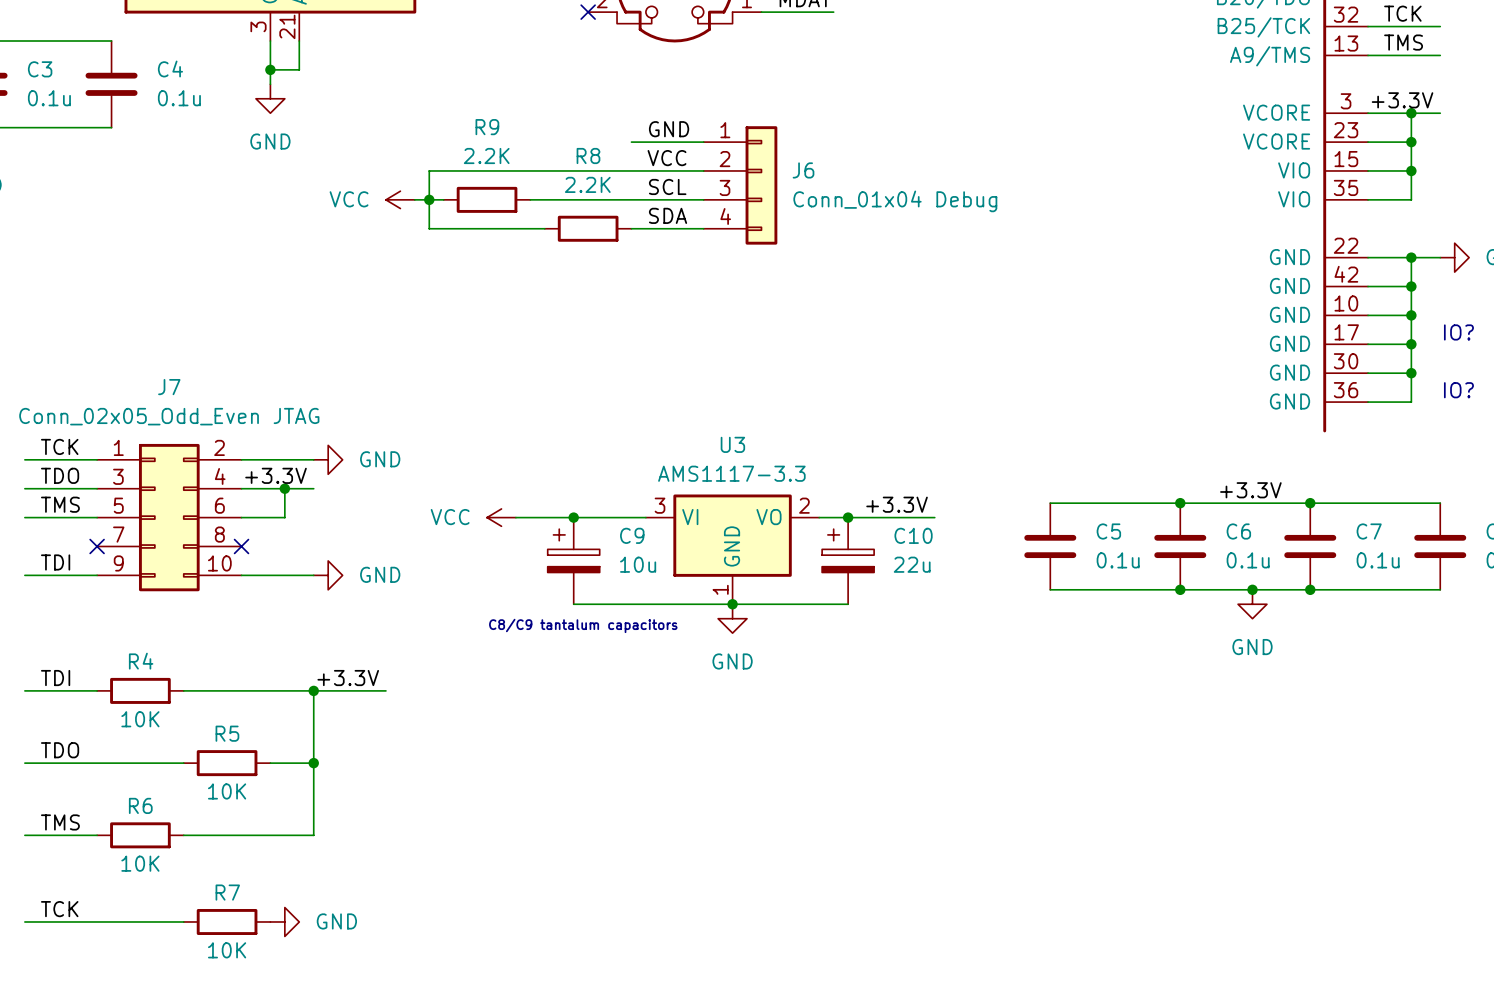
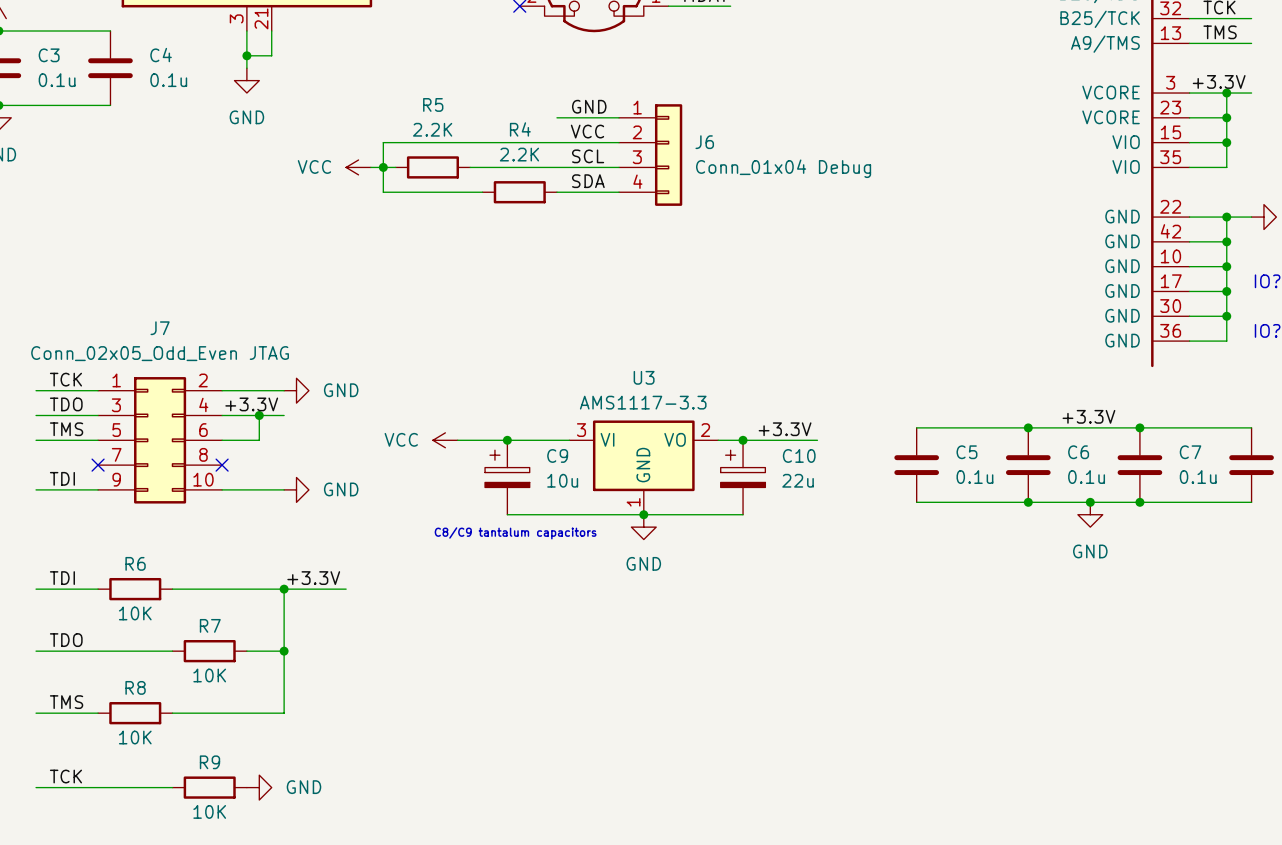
R9 name: R9 (487, 127) -> R5 (433, 104)
R8 name: R8 (588, 156) -> R4 (520, 129)
R4 name: R4 (141, 661) -> R6 (135, 563)
R5 name: R5 (227, 733) -> R7 (210, 625)
R6 name: R6 (140, 805) -> R8 (135, 687)
R7 name: R7 (227, 892) -> R9 (209, 762)

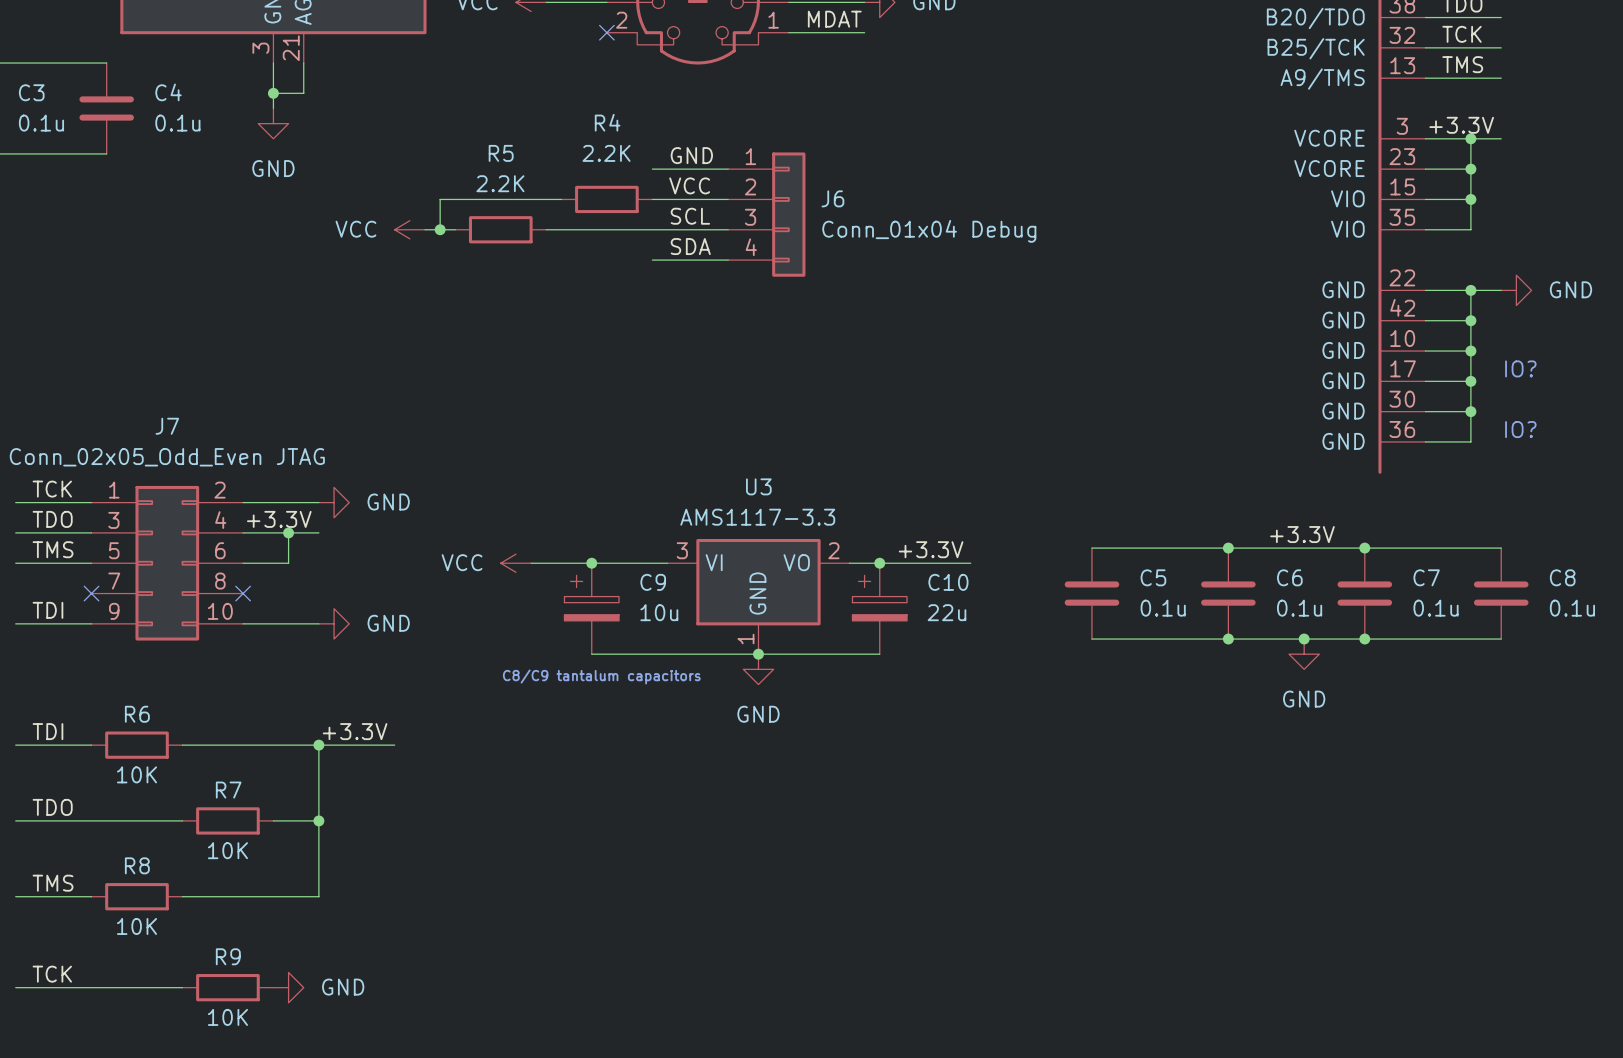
wire: (482, 142) (556, 142) -> none
wire: (383, 167) (383, 192) (482, 192) -> none
R4 position: (519, 192) -> (606, 199)

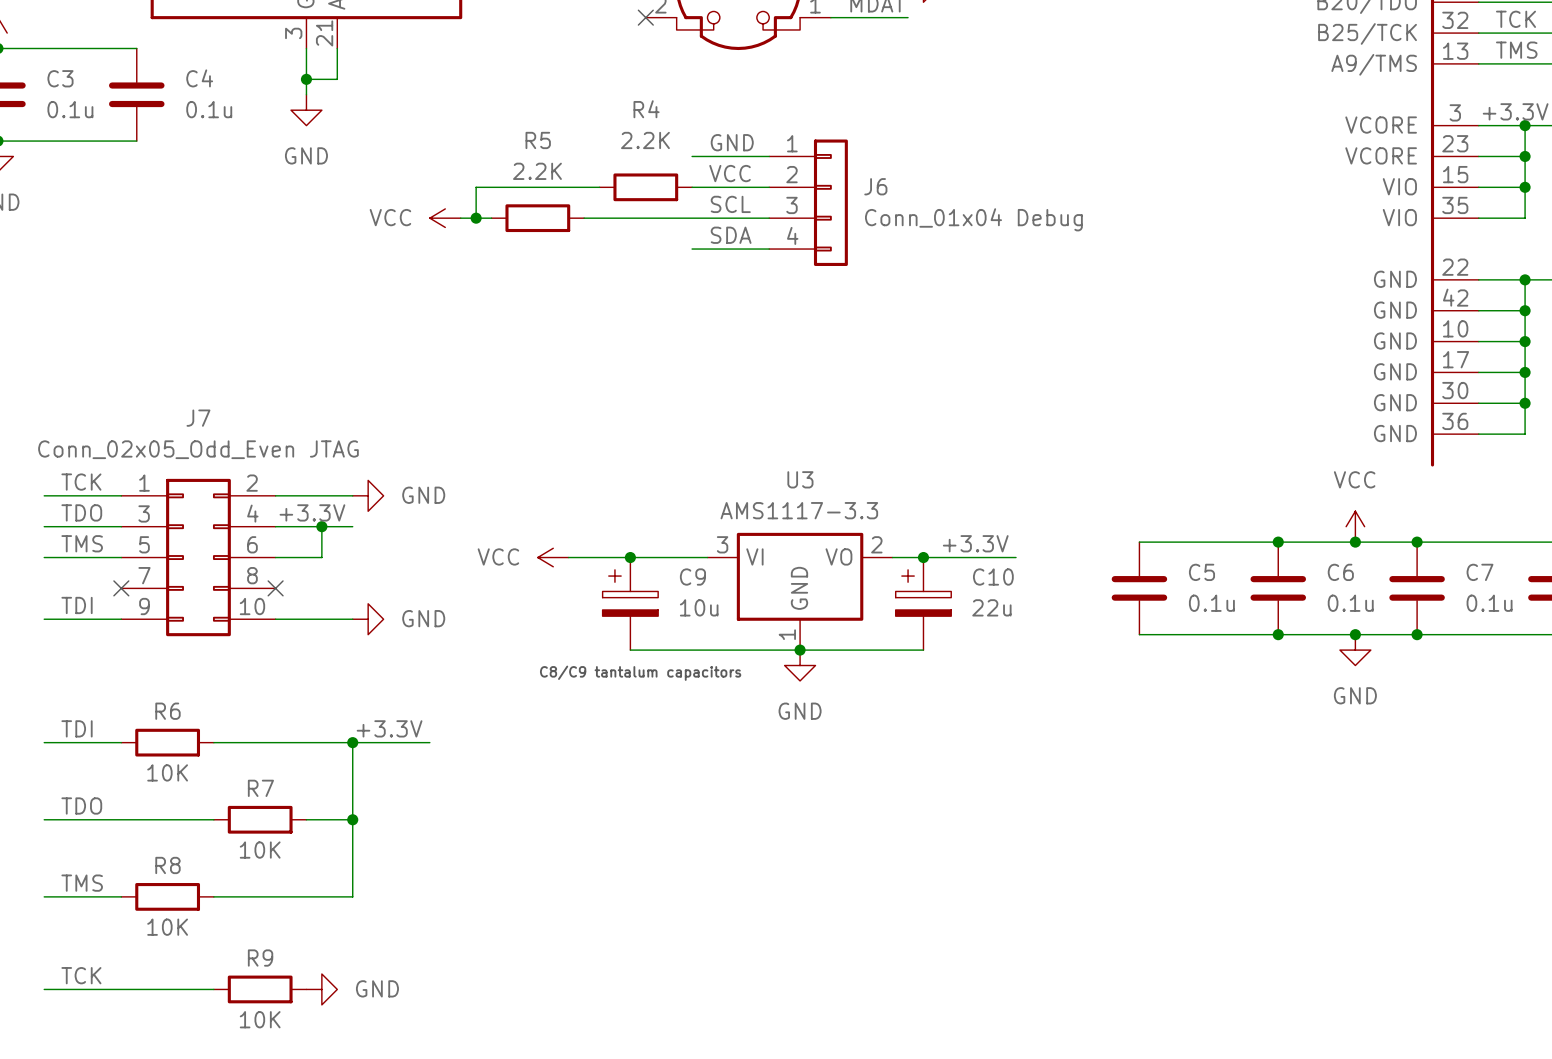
power symbol: none -> VCC (1355, 526)
label: +3.3V (1302, 534) -> none
junction: none -> (1355, 542)

